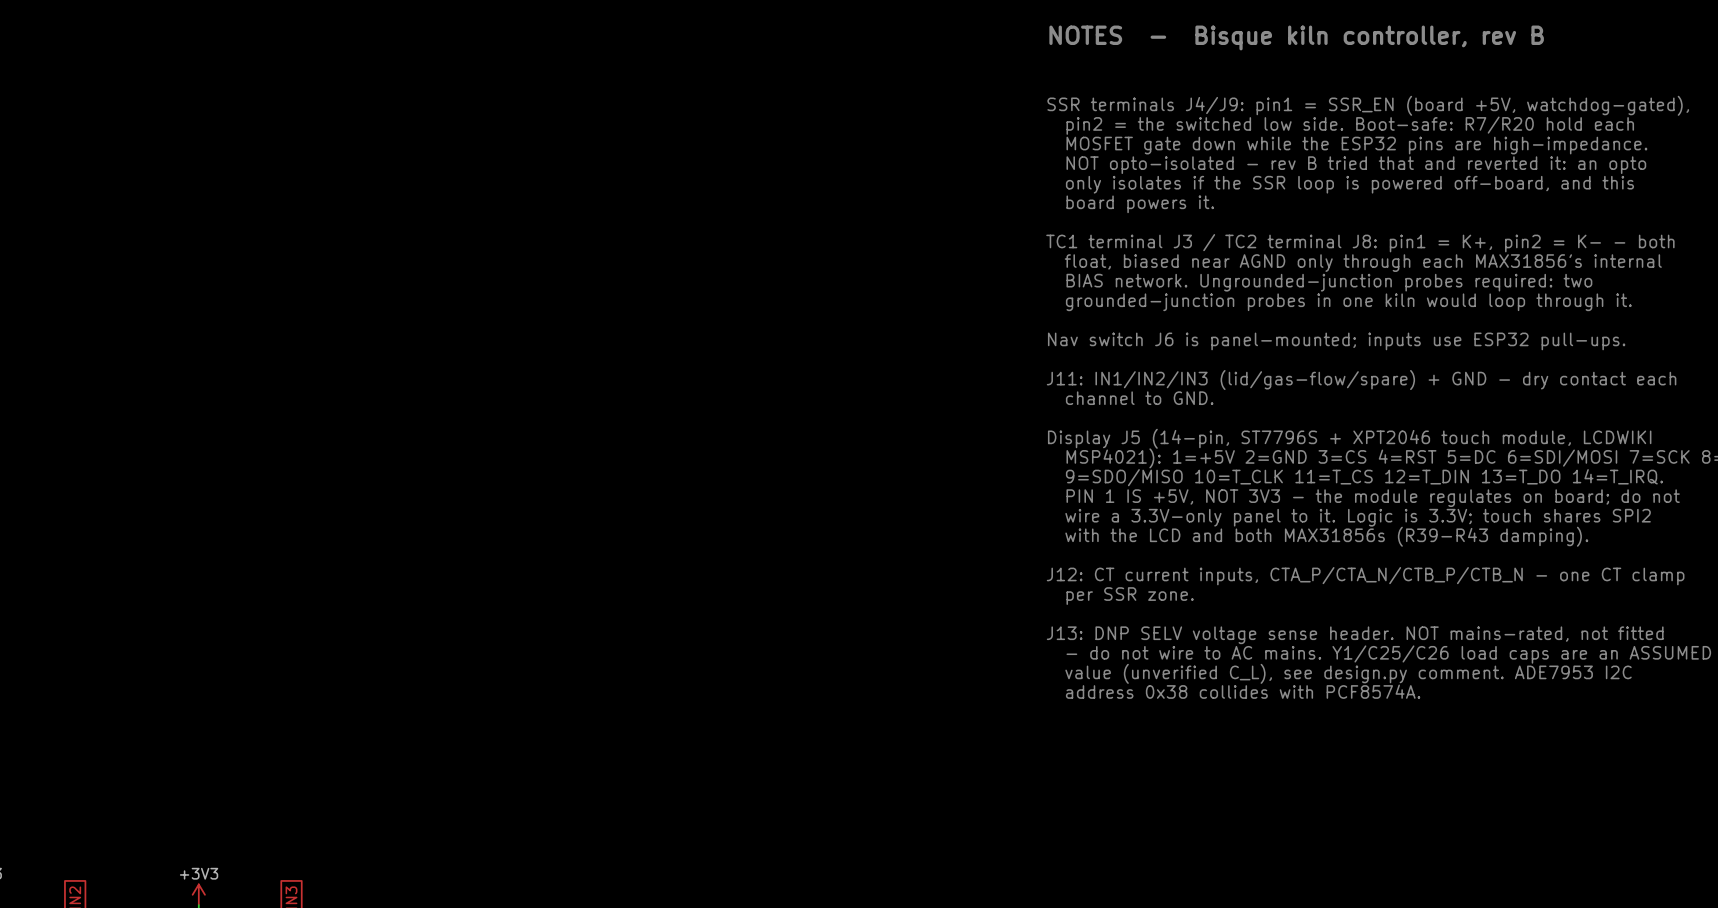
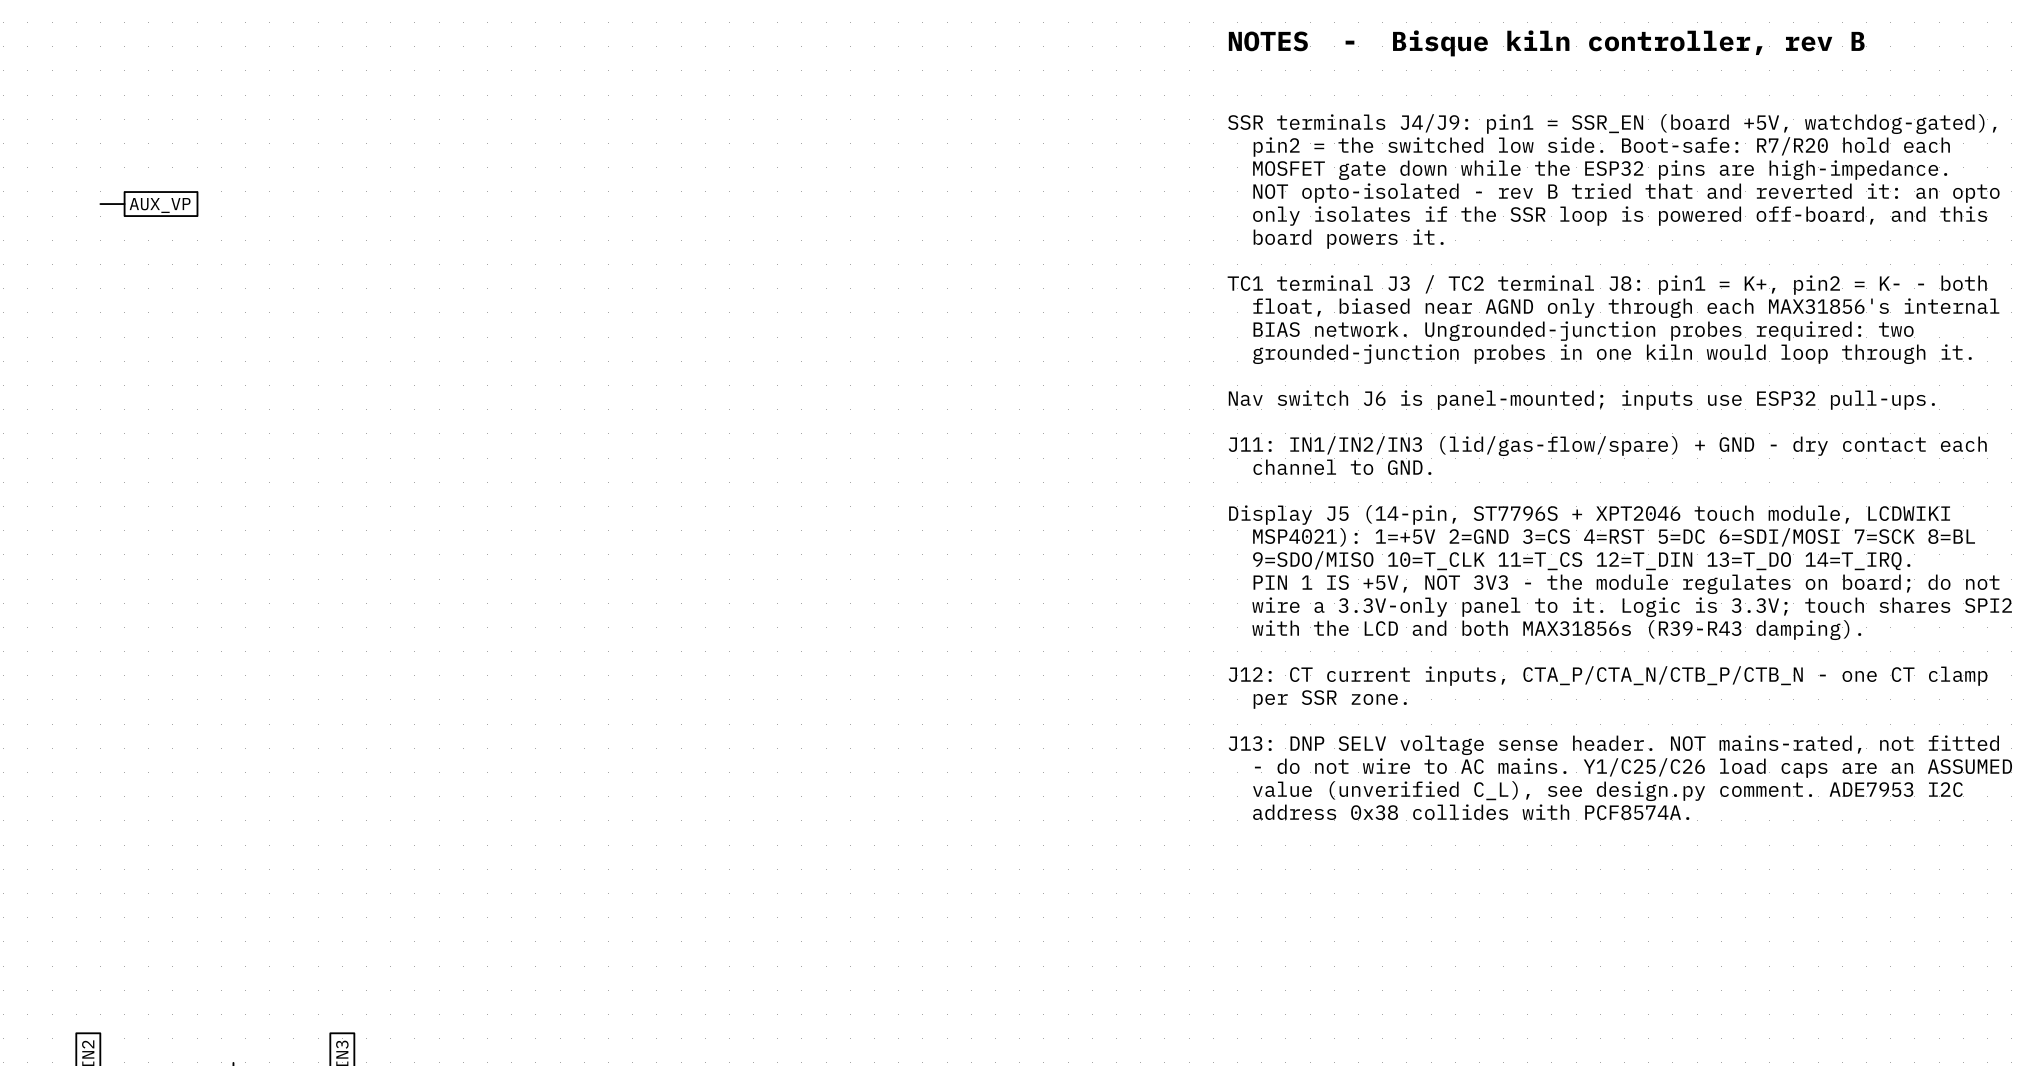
wire: none -> (100, 204) (124, 204)
global label: none -> AUX_VP (160, 205)
power symbol: +3V3 (198, 894) -> none

